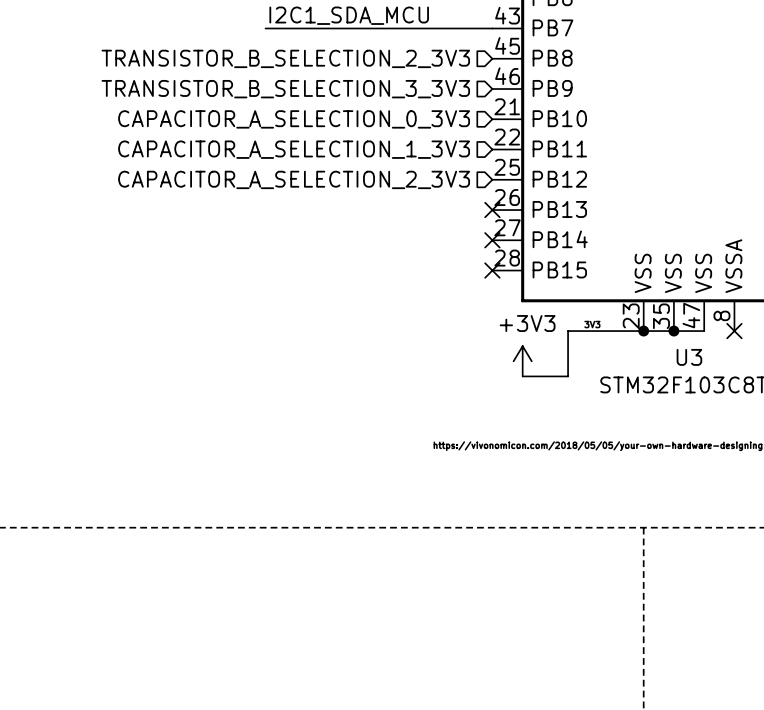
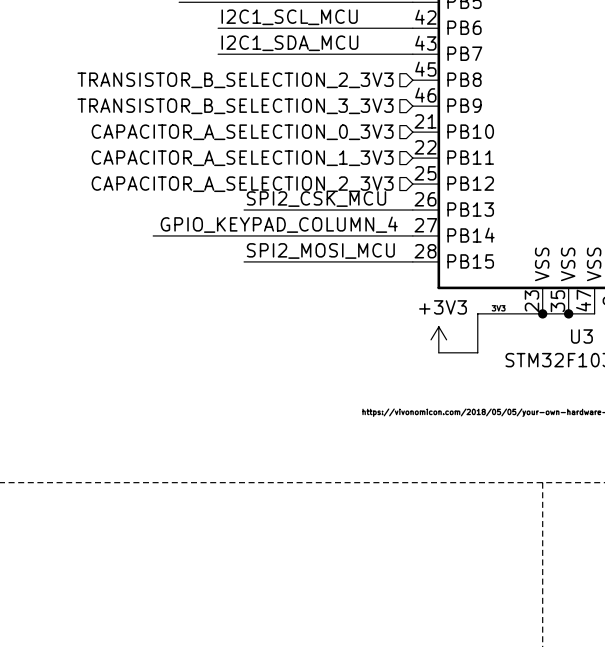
label: none -> SPI2_CSK_MCU (316, 199)
wire: none -> (244, 210) (412, 210)
no-connect mark: (492, 210) -> none
label: none -> GPIO_KEYPAD_COLUMN_4 (279, 224)
wire: none -> (153, 235) (412, 235)
no-connect mark: (492, 240) -> none
label: none -> SPI2_MOSI_MCU (320, 250)
wire: none -> (244, 261) (412, 261)
no-connect mark: (492, 270) -> none

